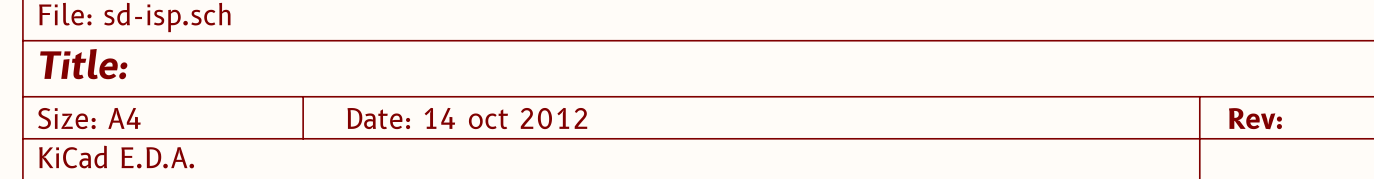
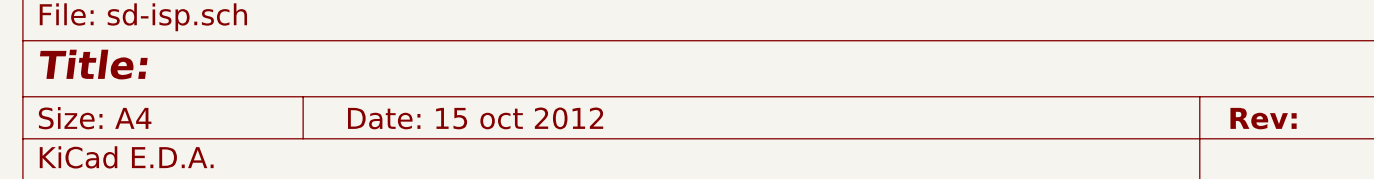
title block: Date: 14 oct 2012 (467, 118) -> Date: 15 oct 2012 (475, 118)

